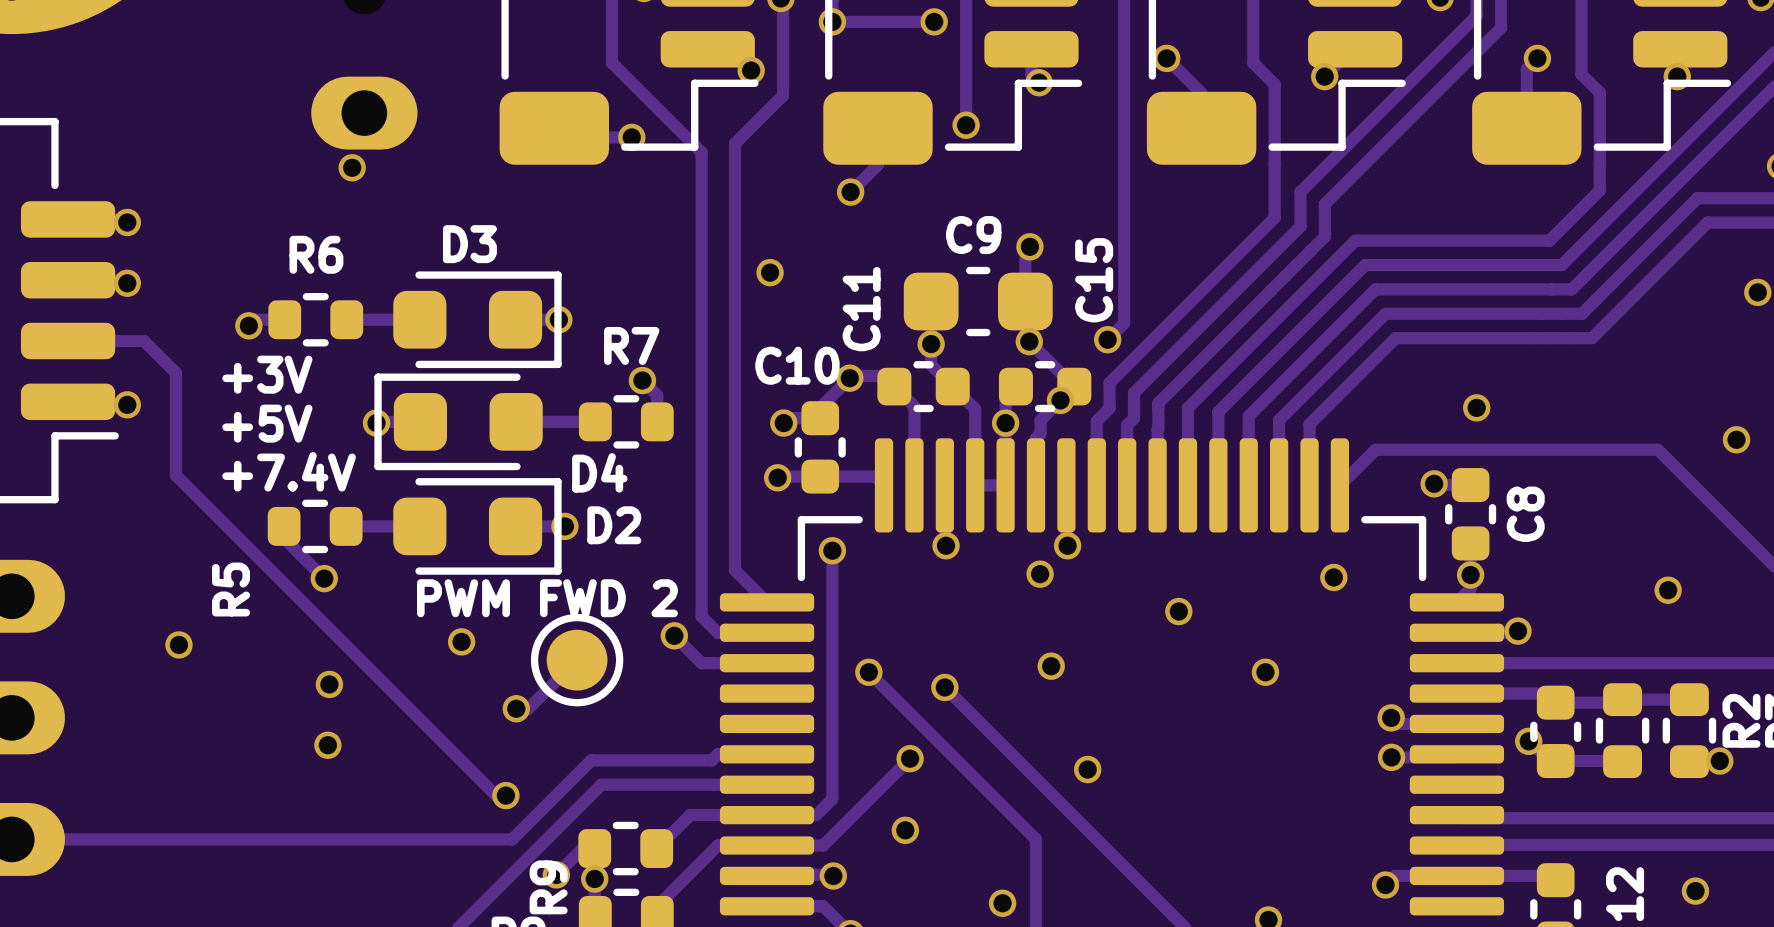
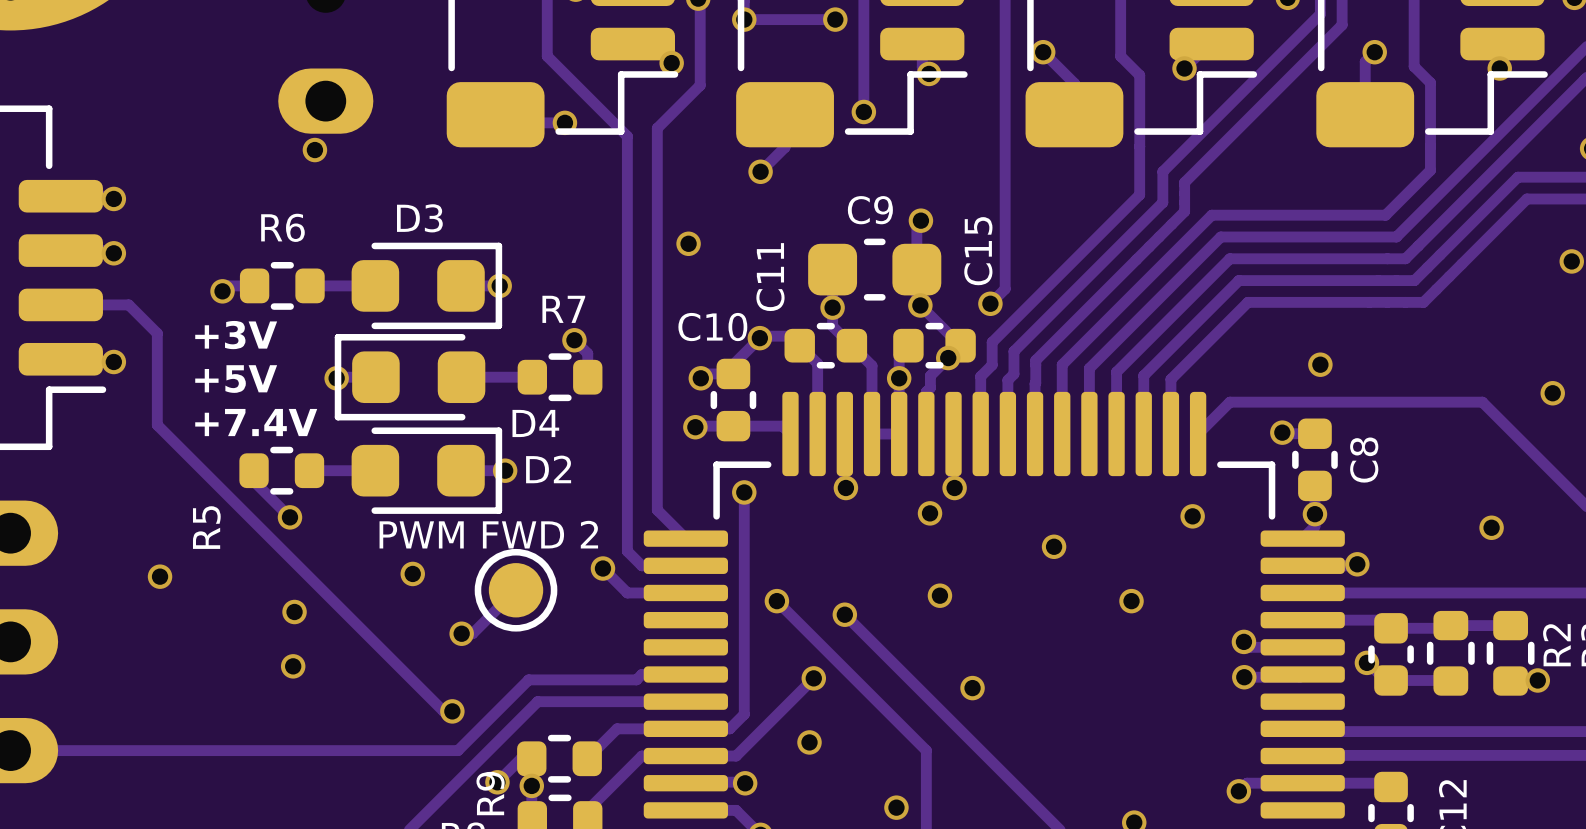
via: (1695, 891) -> none

